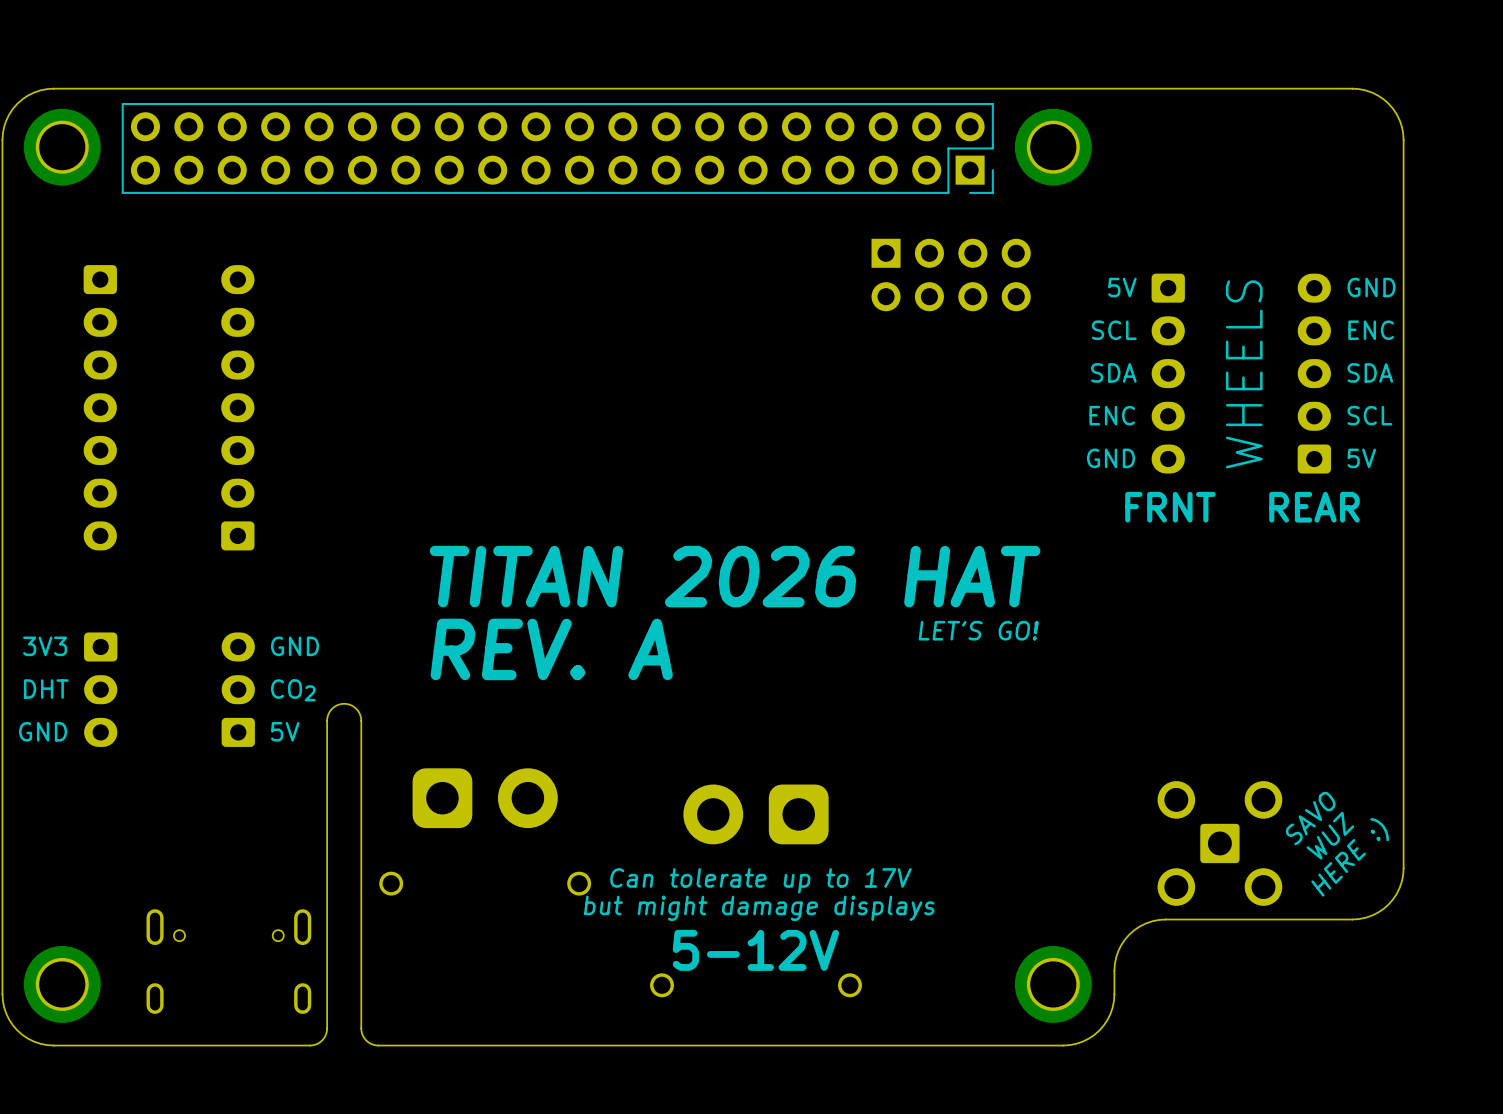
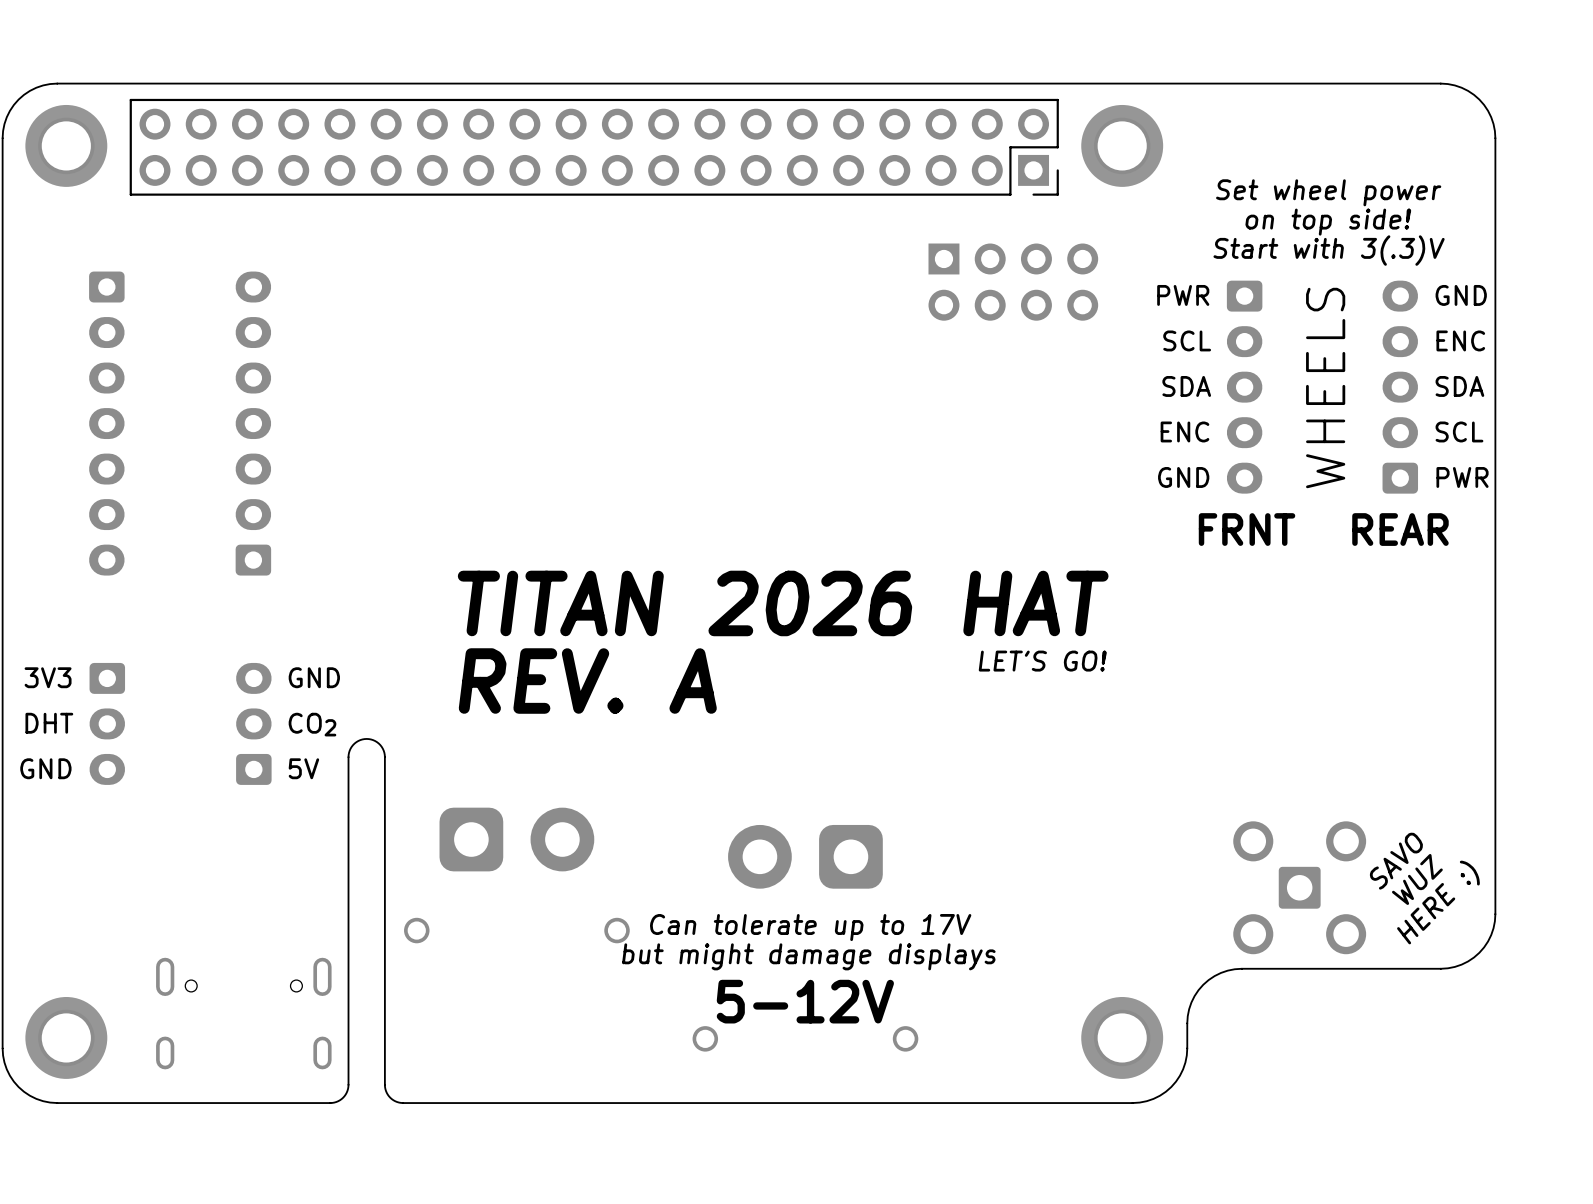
text: none -> Set wheel power (1328, 192)
text: none -> on top side! (1328, 222)
text: none -> Start with 3(.3)V (1329, 250)
text: 5V (1122, 287) -> PWR (1183, 295)
text: 5V (1361, 458) -> PWR (1462, 477)

